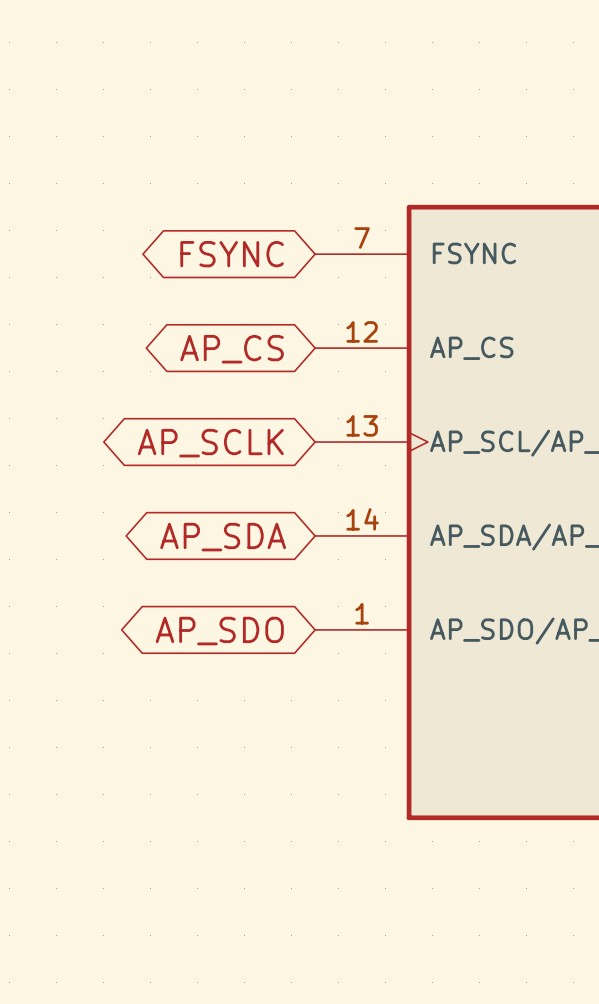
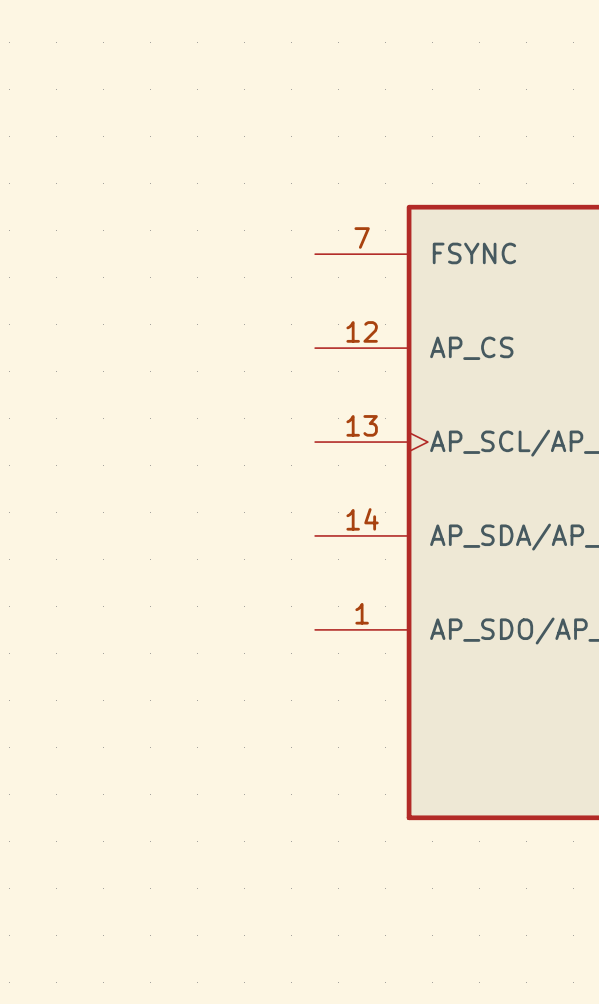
global label: FSYNC (232, 254) -> none
global label: AP_CS (232, 349) -> none
global label: AP_SCLK (210, 443) -> none
global label: AP_SDA (223, 537) -> none
global label: AP_SDO (219, 631) -> none

